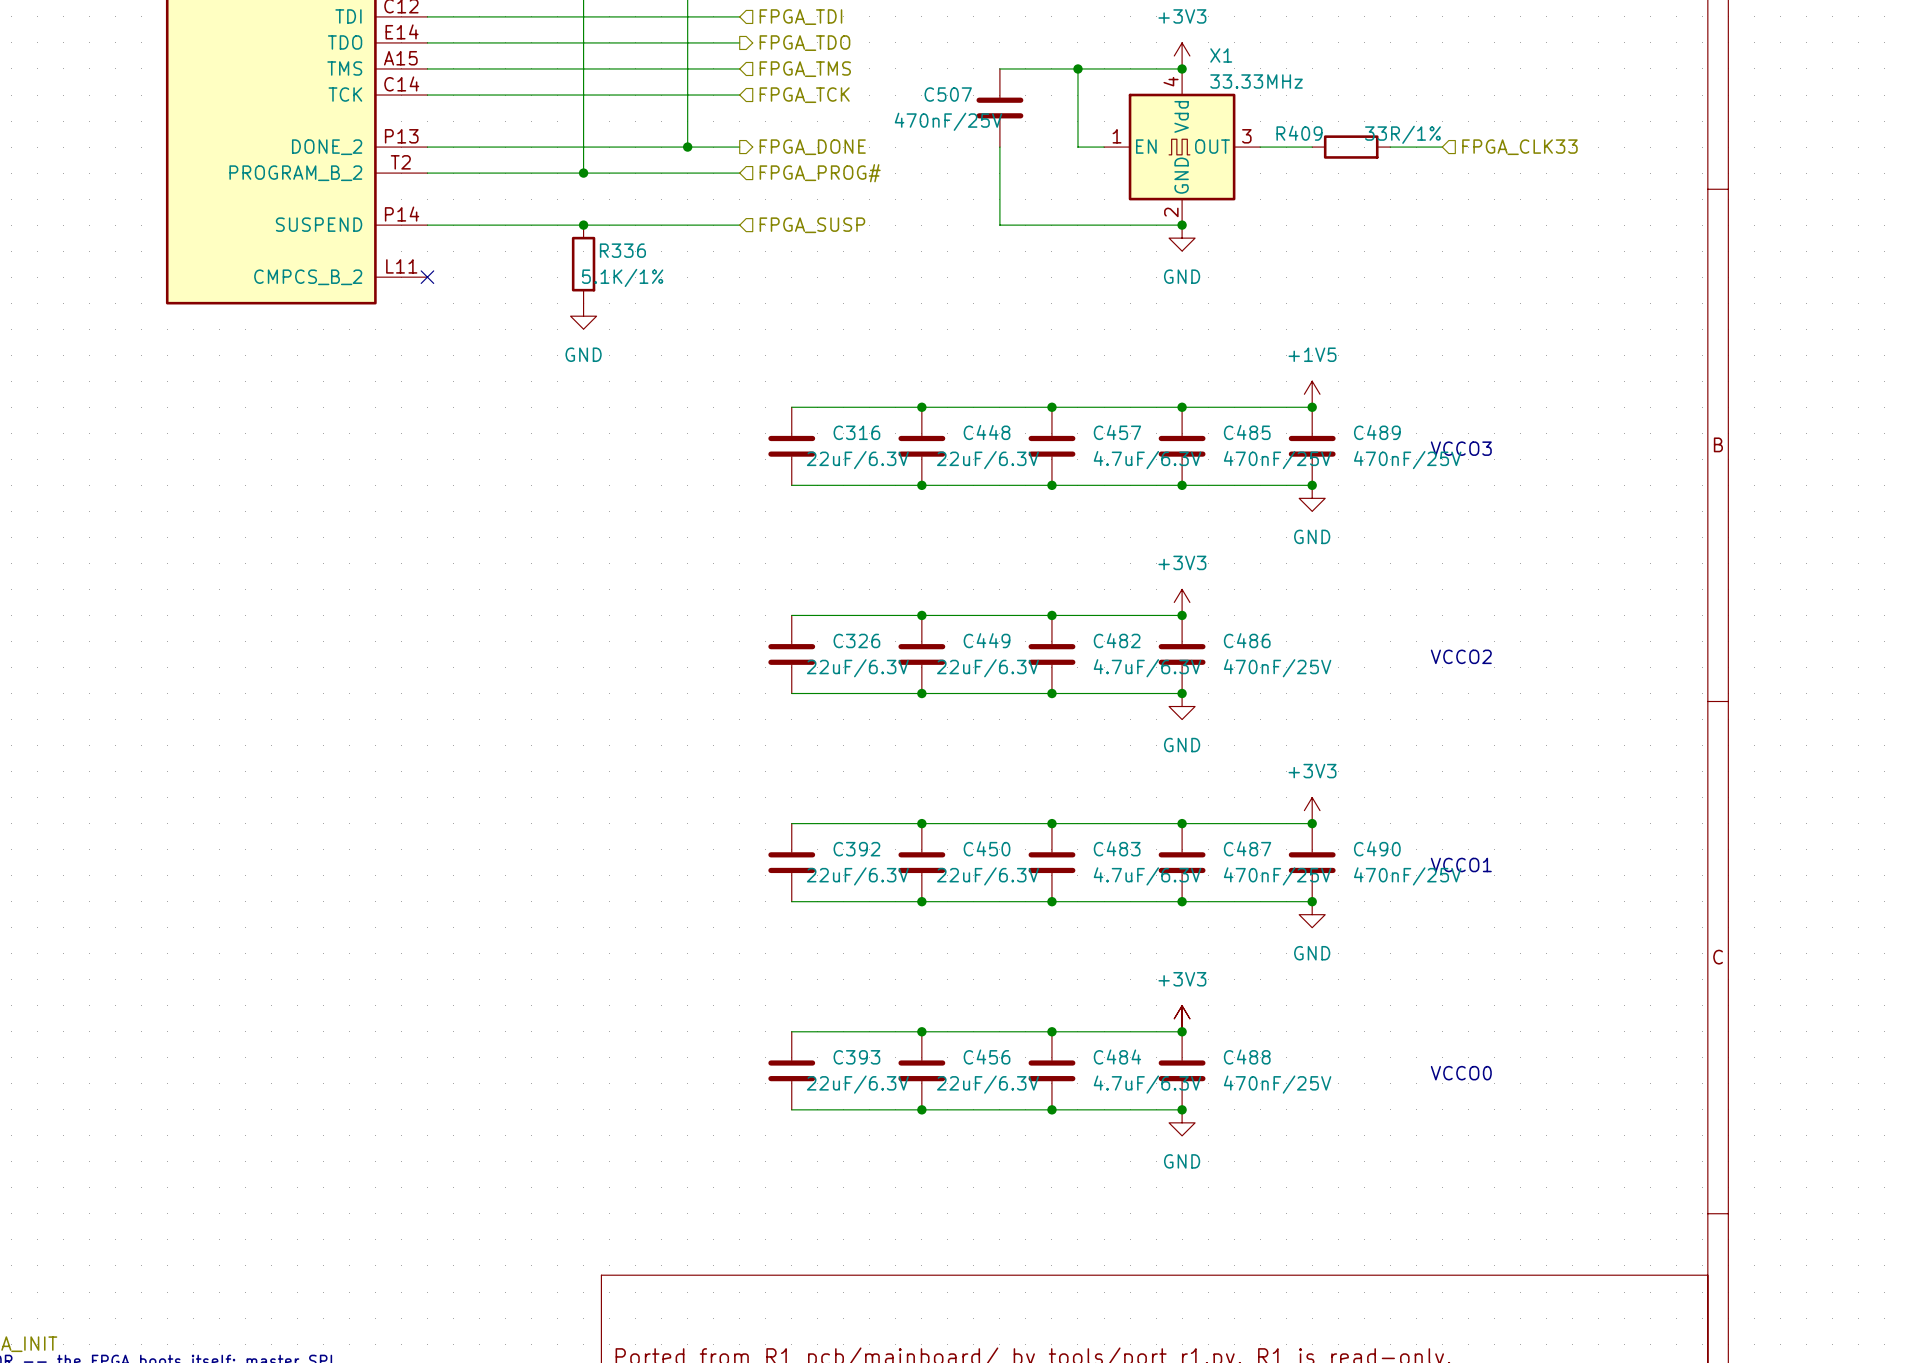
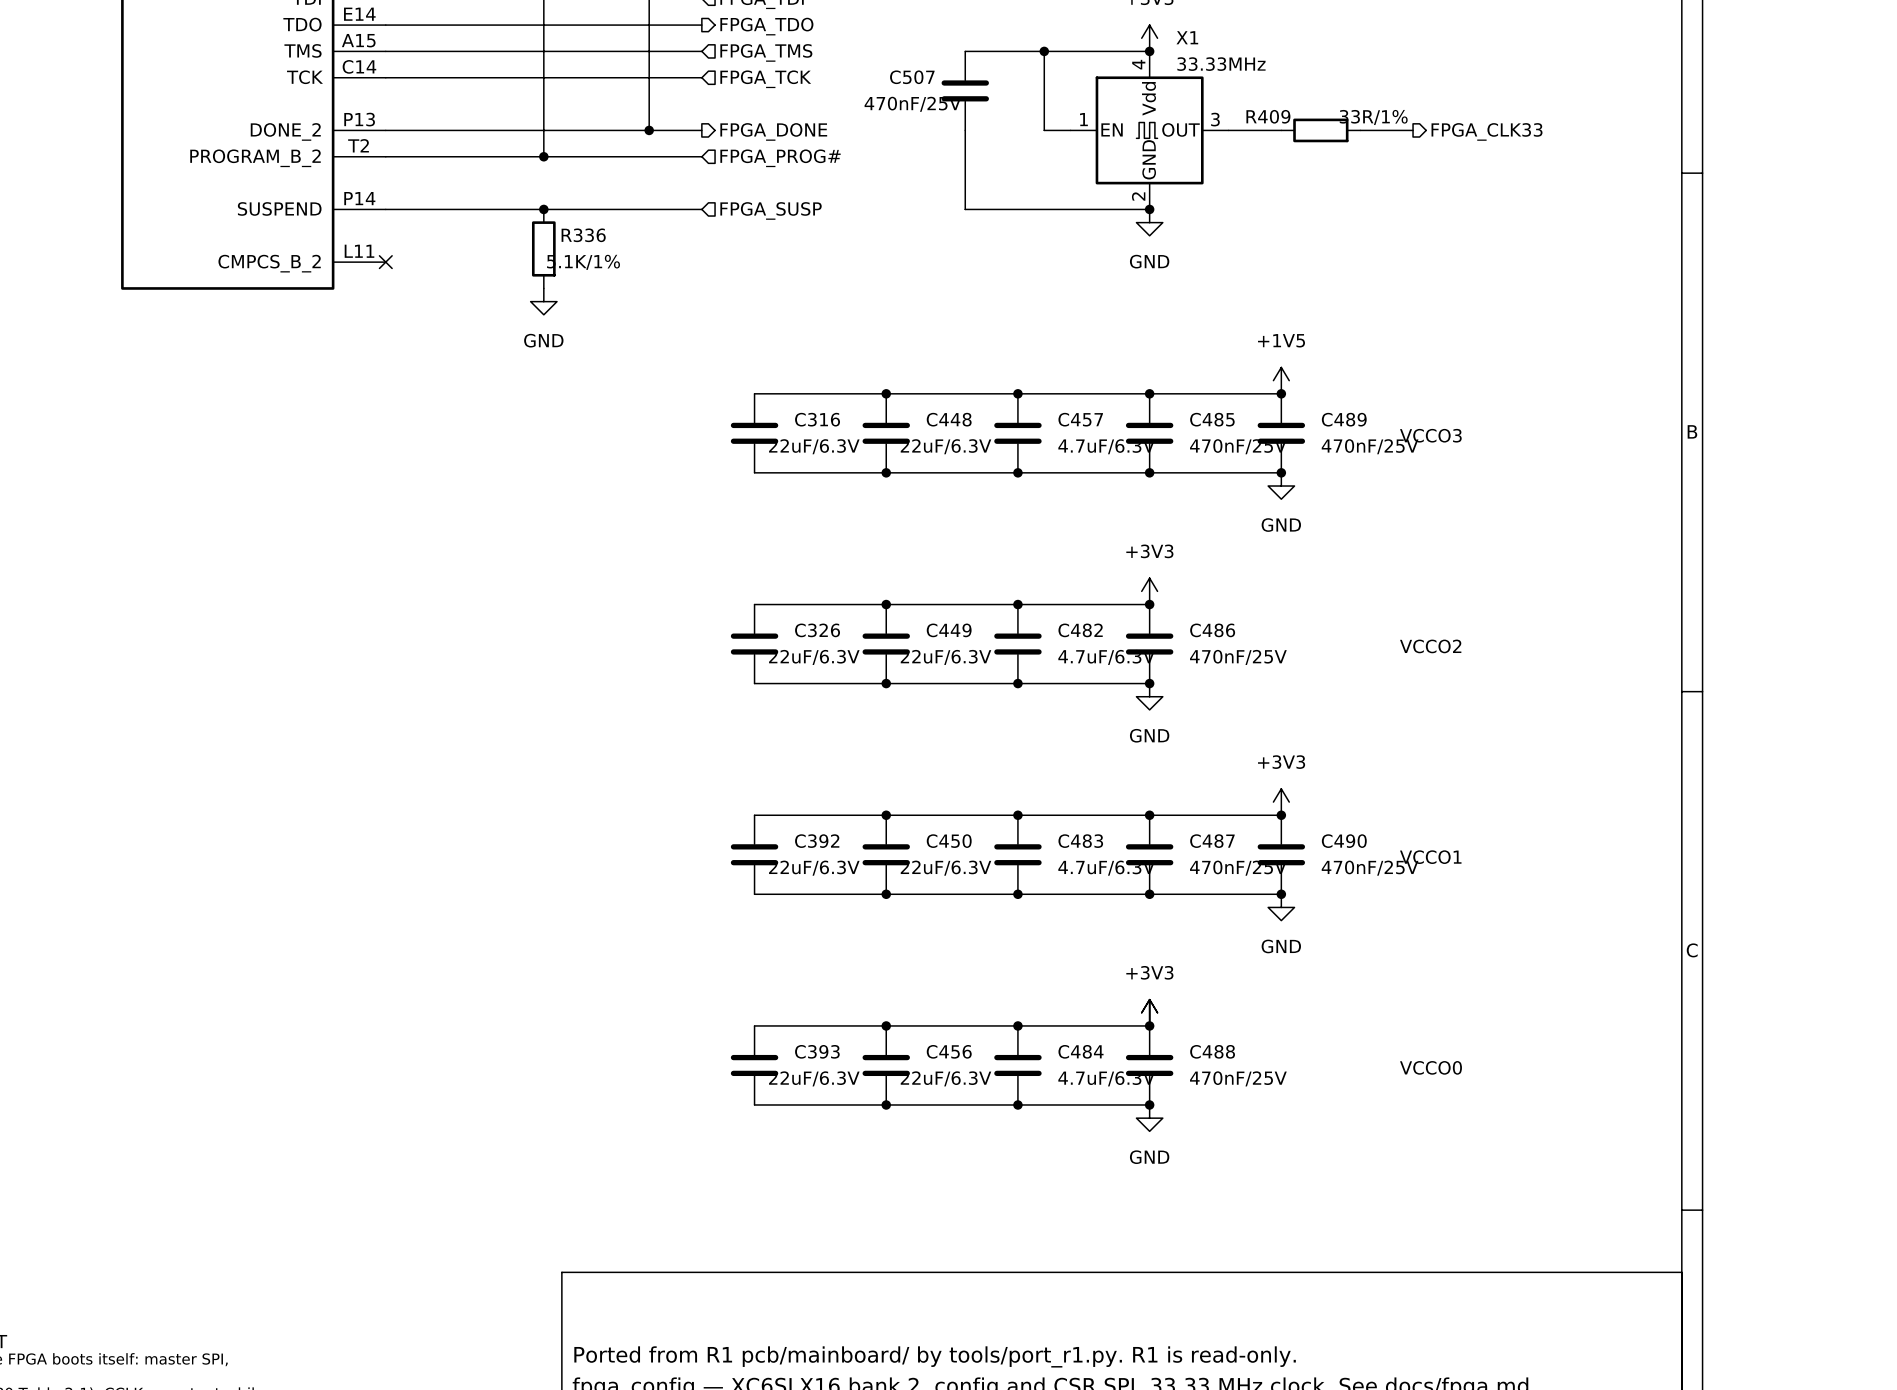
hierarchical label shape: input (1519, 147) -> output (1487, 131)

